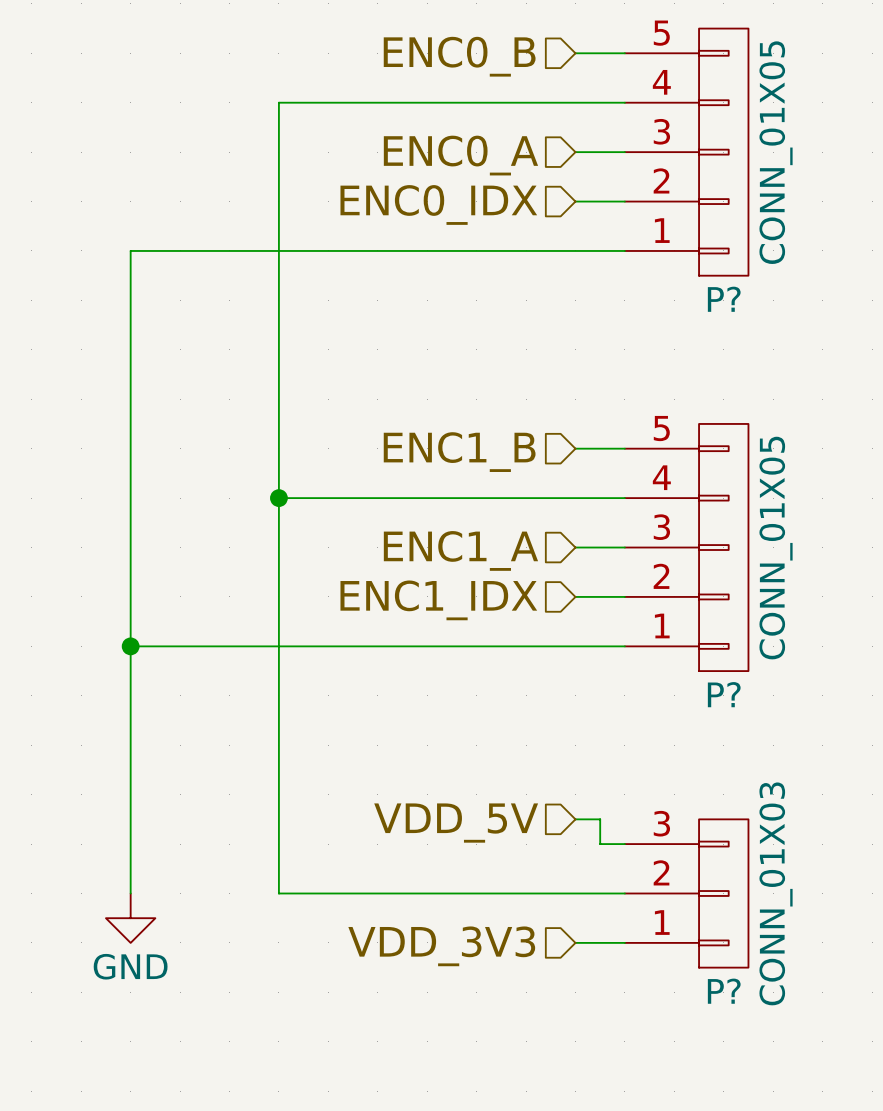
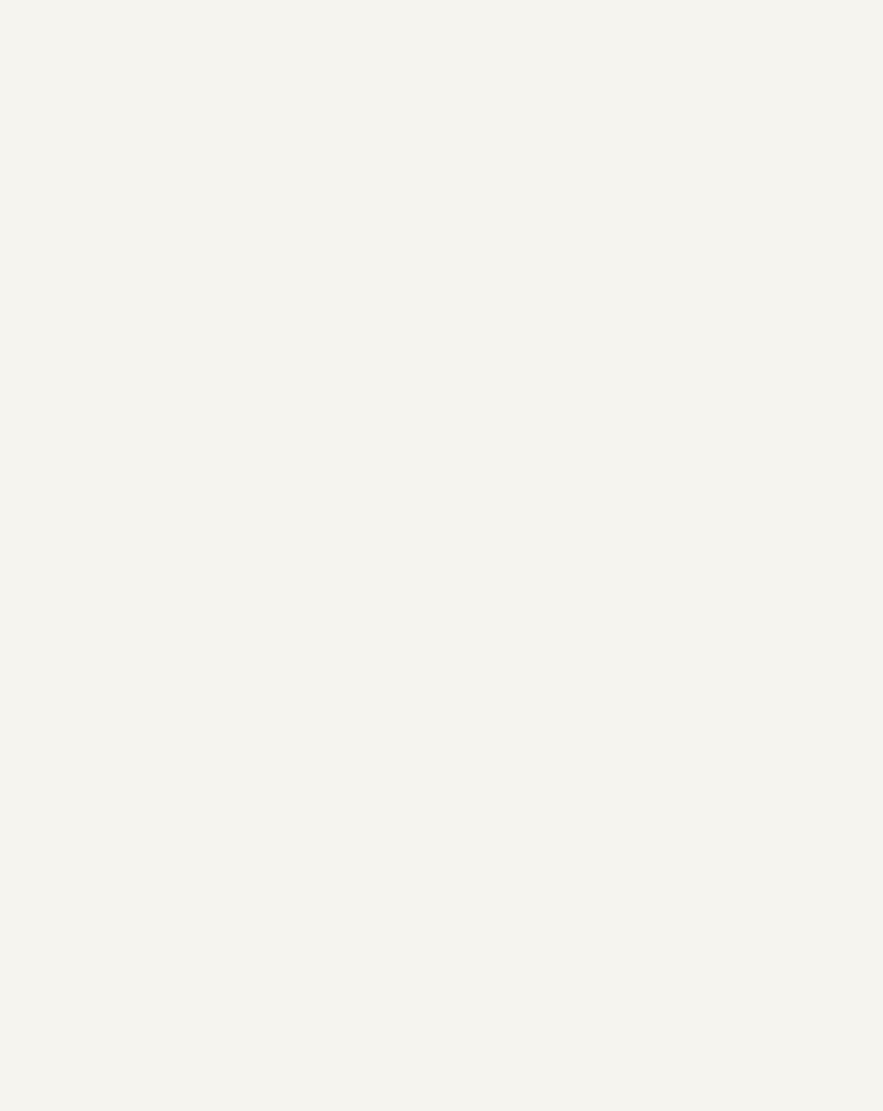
wire: (575, 53) (624, 53) -> none
hierarchical label: ENC0_B (459, 56) -> none
wire: (624, 102) (278, 102) (278, 893) (624, 893) -> none
wire: (575, 152) (624, 152) -> none
P?: CONN_01X05 (686, 152) -> none
hierarchical label: ENC0_A (460, 155) -> none
wire: (575, 201) (624, 201) -> none
hierarchical label: ENC0_IDX (438, 204) -> none
wire: (624, 250) (130, 250) (130, 893) -> none
wire: (575, 448) (624, 448) -> none
hierarchical label: ENC1_B (459, 452) -> none
wire: (278, 498) (624, 498) -> none
junction: (278, 498) -> none
wire: (575, 547) (624, 547) -> none
P?: CONN_01X05 (686, 547) -> none
hierarchical label: ENC1_A (460, 550) -> none
wire: (575, 596) (624, 596) -> none
hierarchical label: ENC1_IDX (438, 600) -> none
wire: (130, 646) (624, 646) -> none
junction: (130, 646) -> none
wire: (575, 819) (600, 819) (600, 844) (624, 844) -> none
hierarchical label: VDD_5V (456, 823) -> none
P?: CONN_01X03 (686, 893) -> none
power symbol: GND (130, 918) -> none
wire: (575, 942) (624, 942) -> none
hierarchical label: VDD_3V3 (441, 946) -> none

